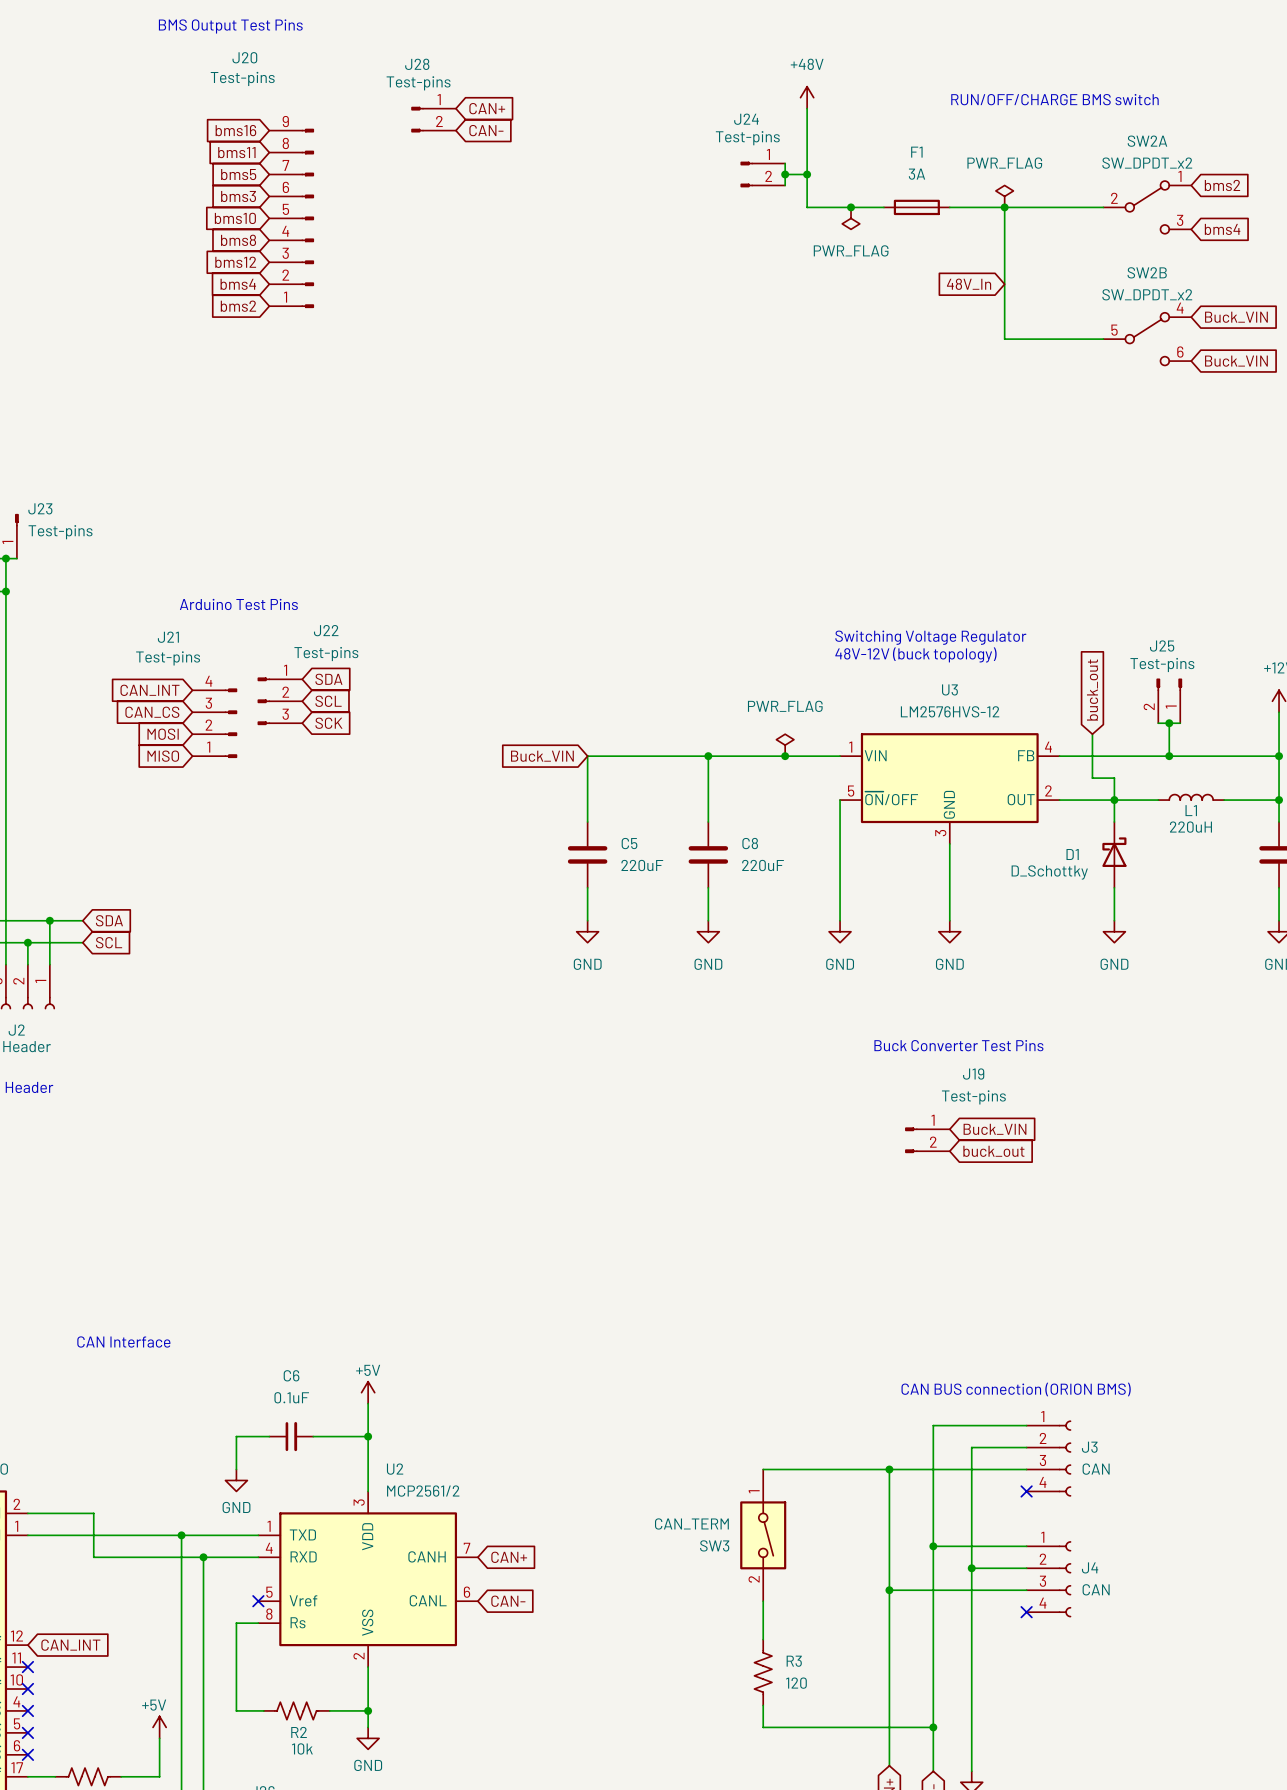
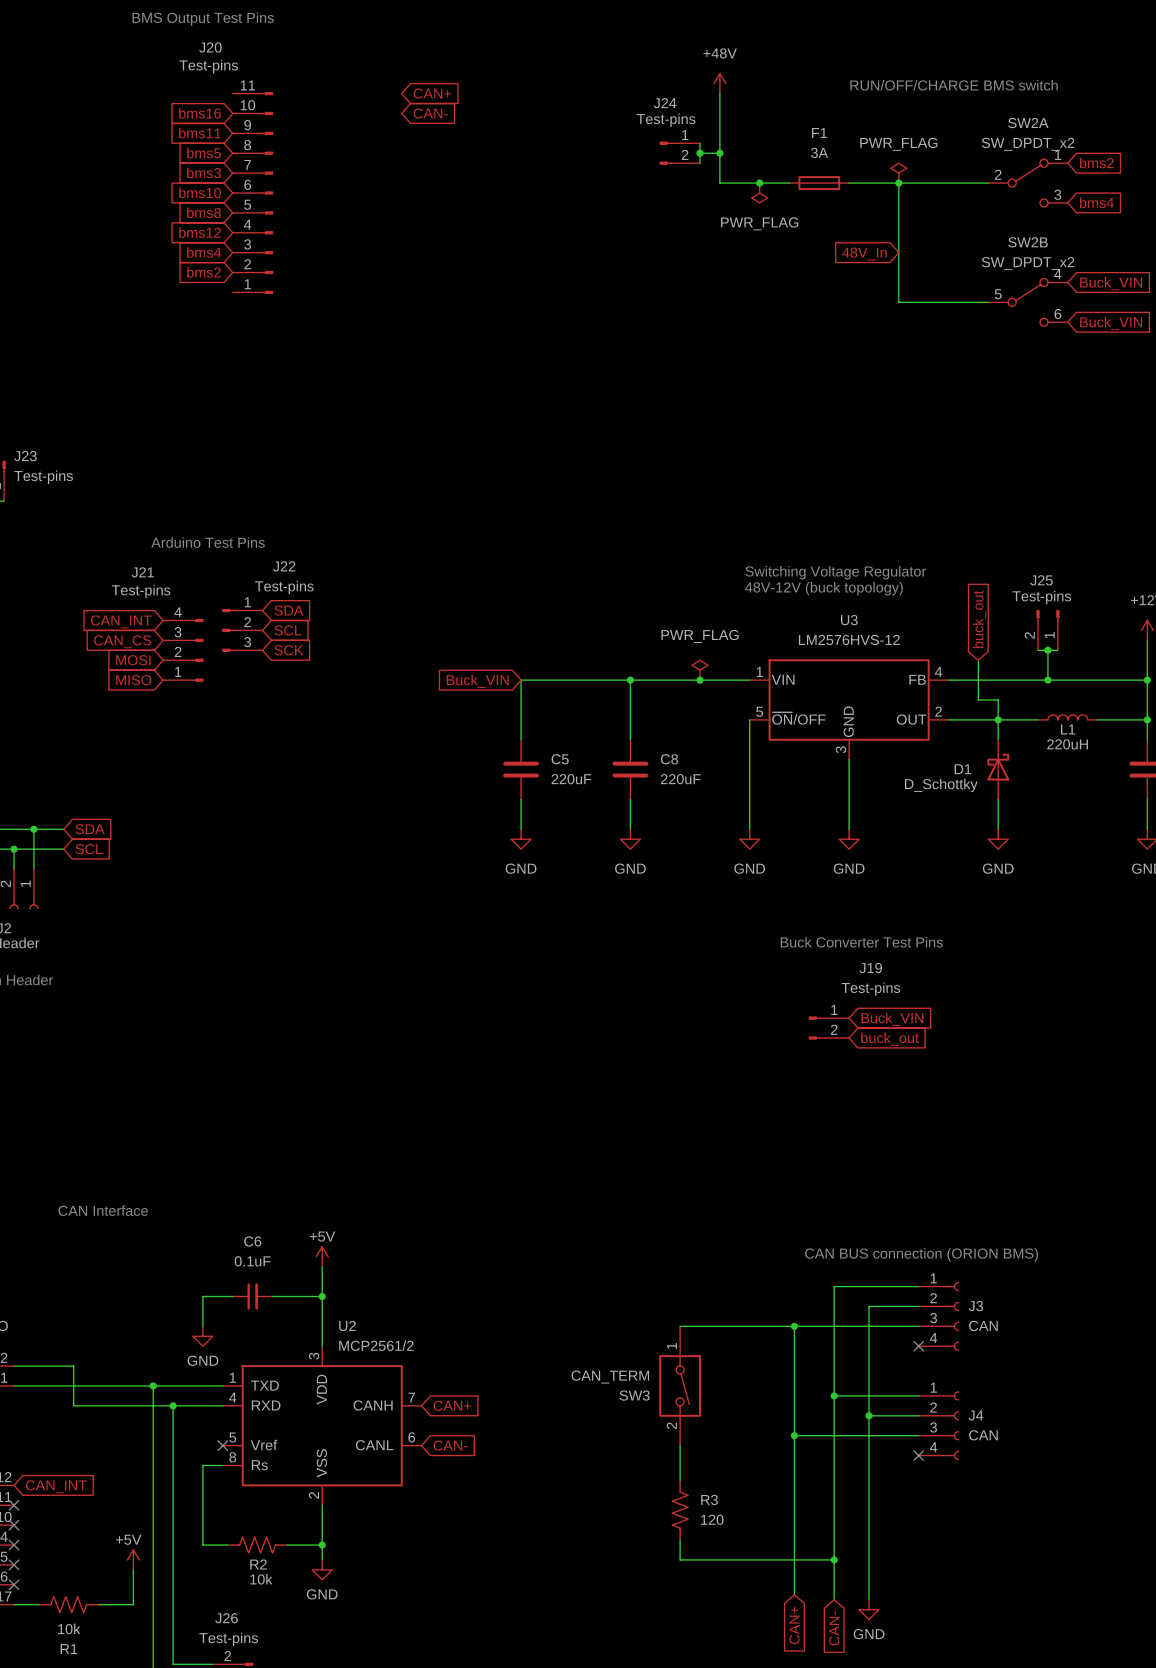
J28: Test-pins (433, 119) -> none
J20 symbol: [269, 128, 314, 308] -> [232, 92, 274, 295]

